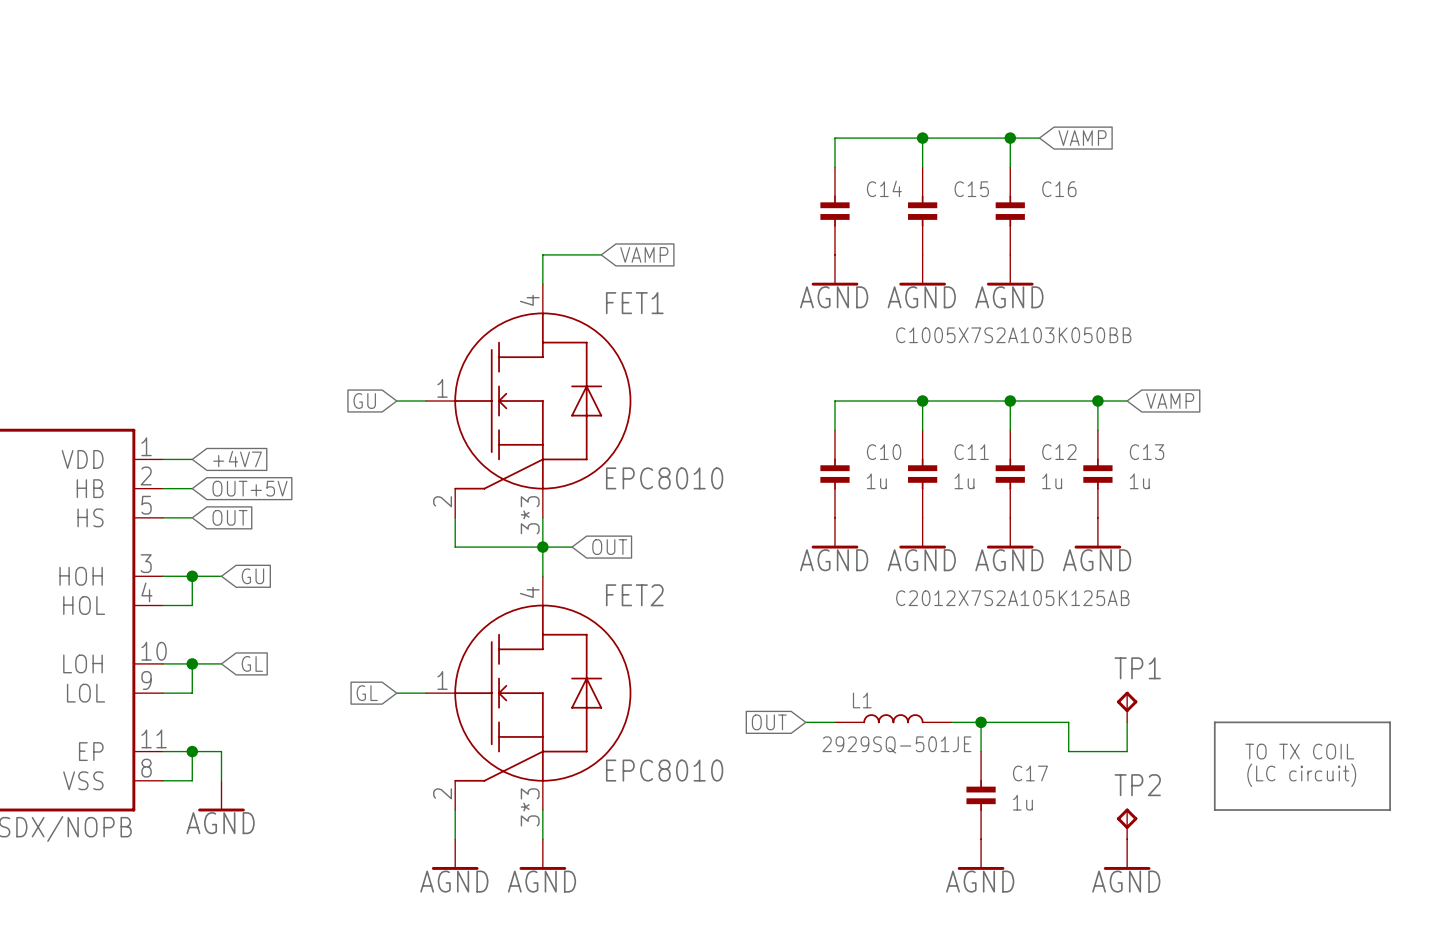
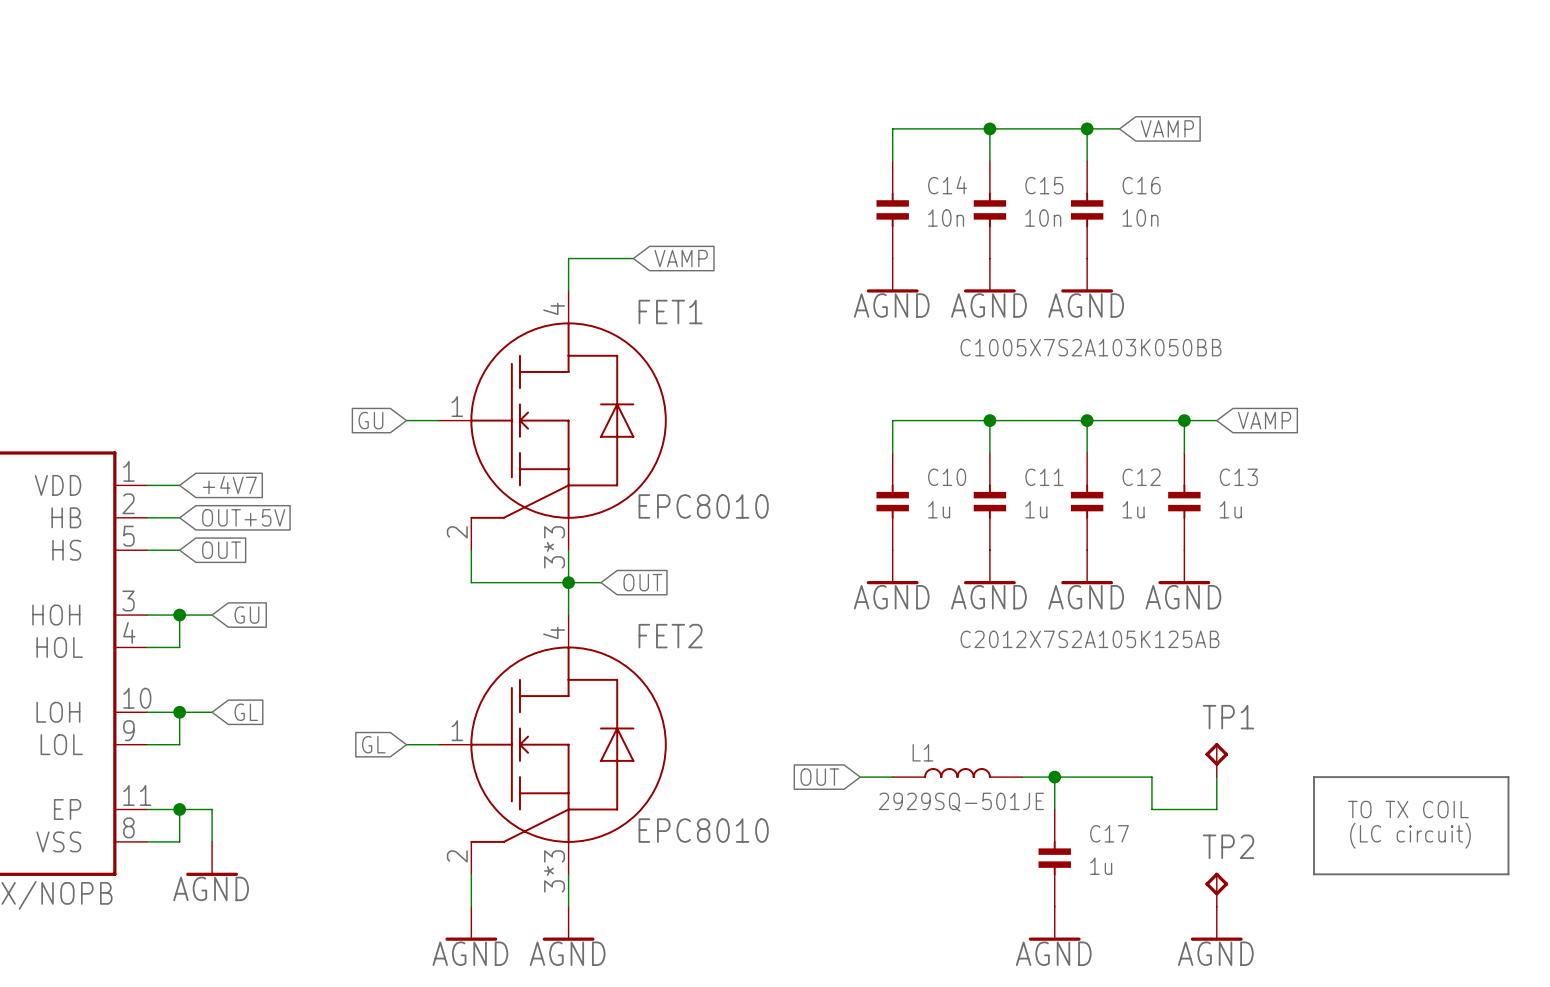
C14 value: none -> 10n (946, 218)
C15 value: none -> 10n (1043, 218)
C16 value: none -> 10n (1140, 218)

